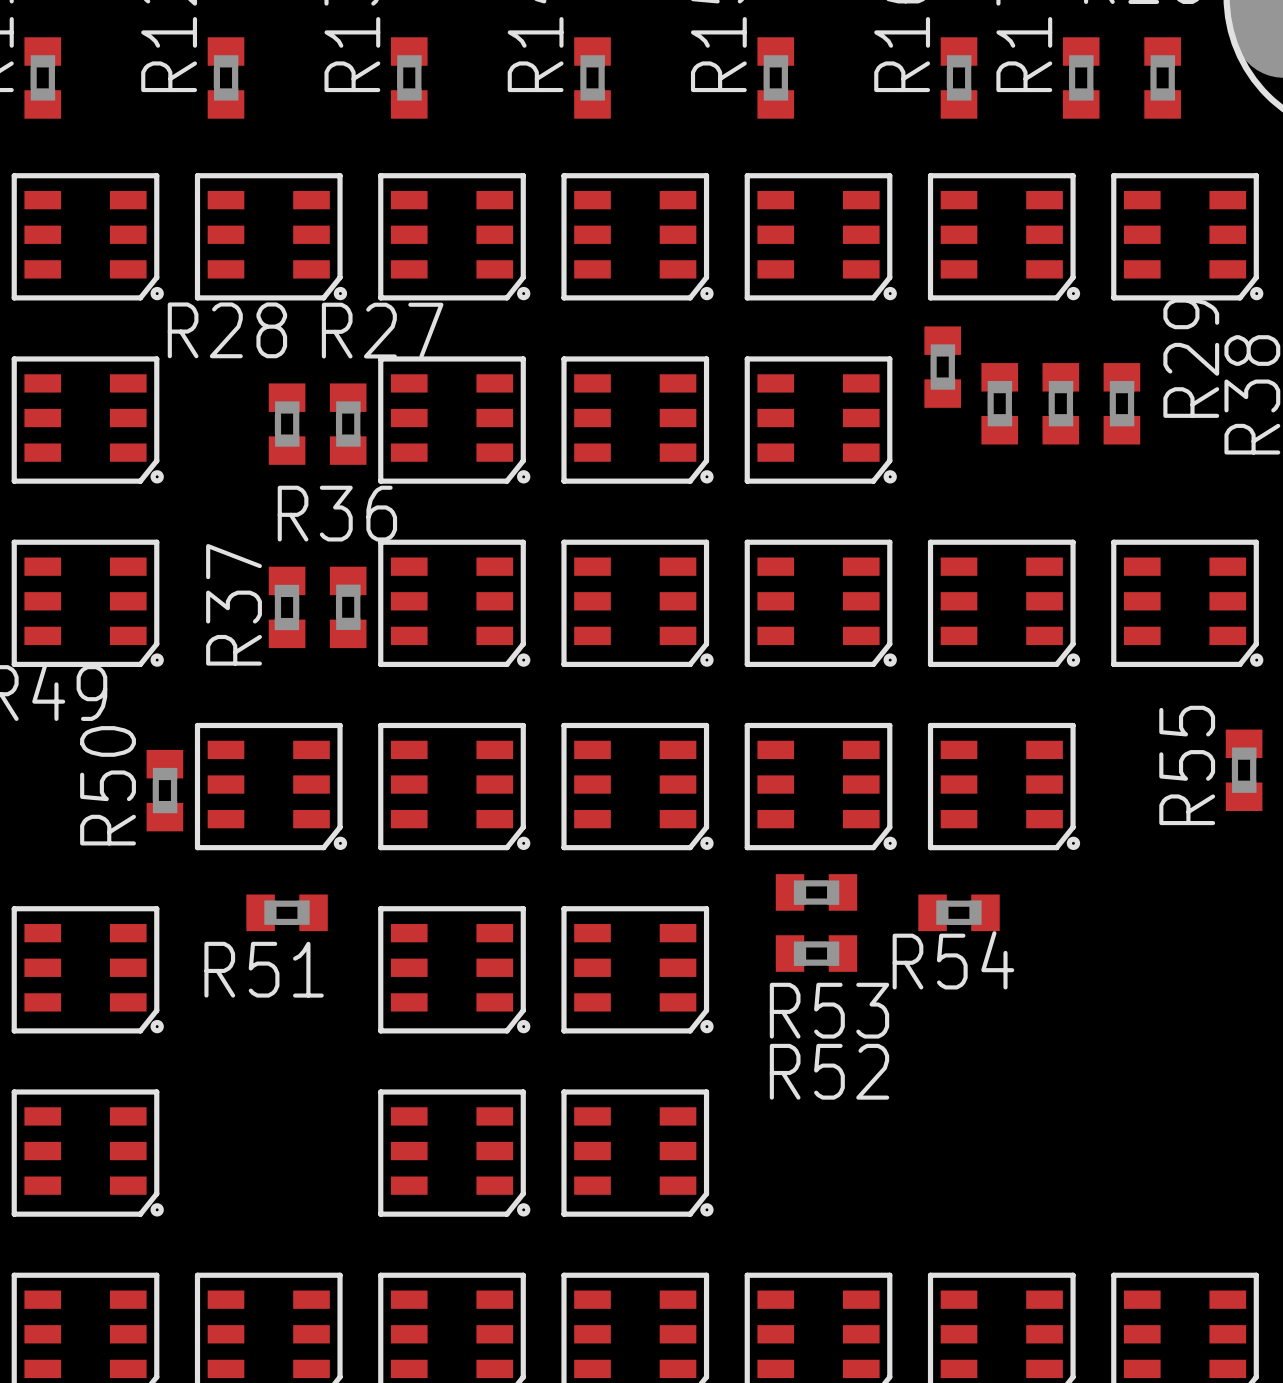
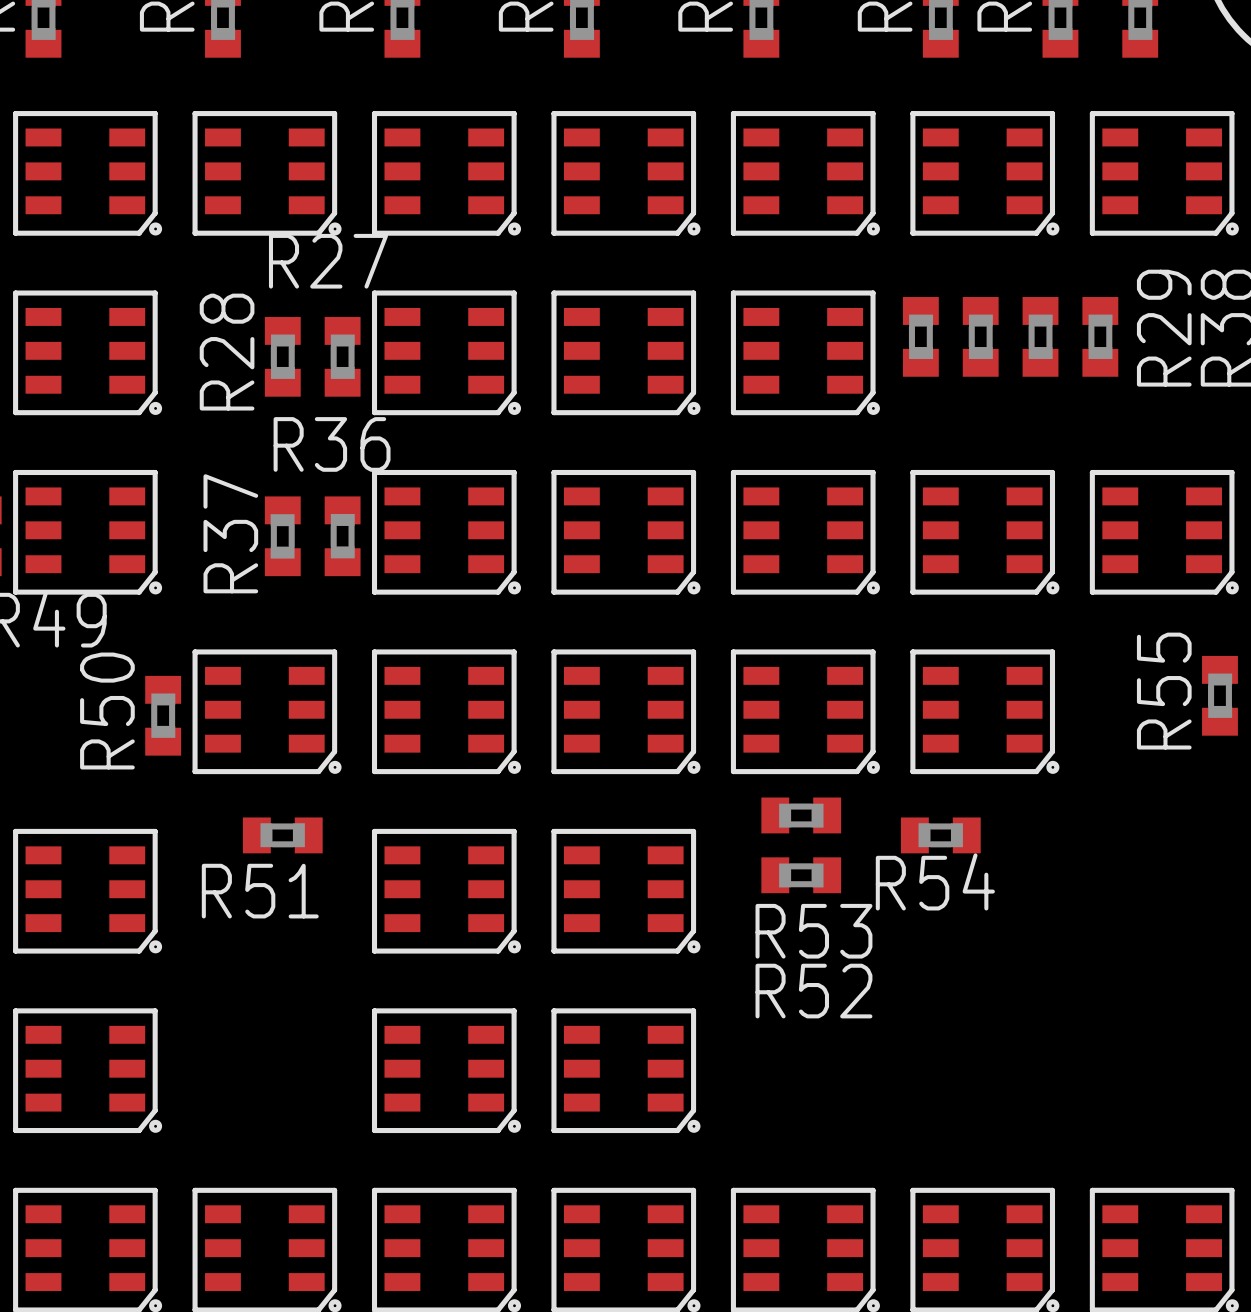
R28 name rotation: 0° (227, 330) -> 90° counterclockwise (227, 352)
R27 name position: R27 (382, 330) -> R27 (328, 261)
R29 position: (942, 367) -> (920, 336)

